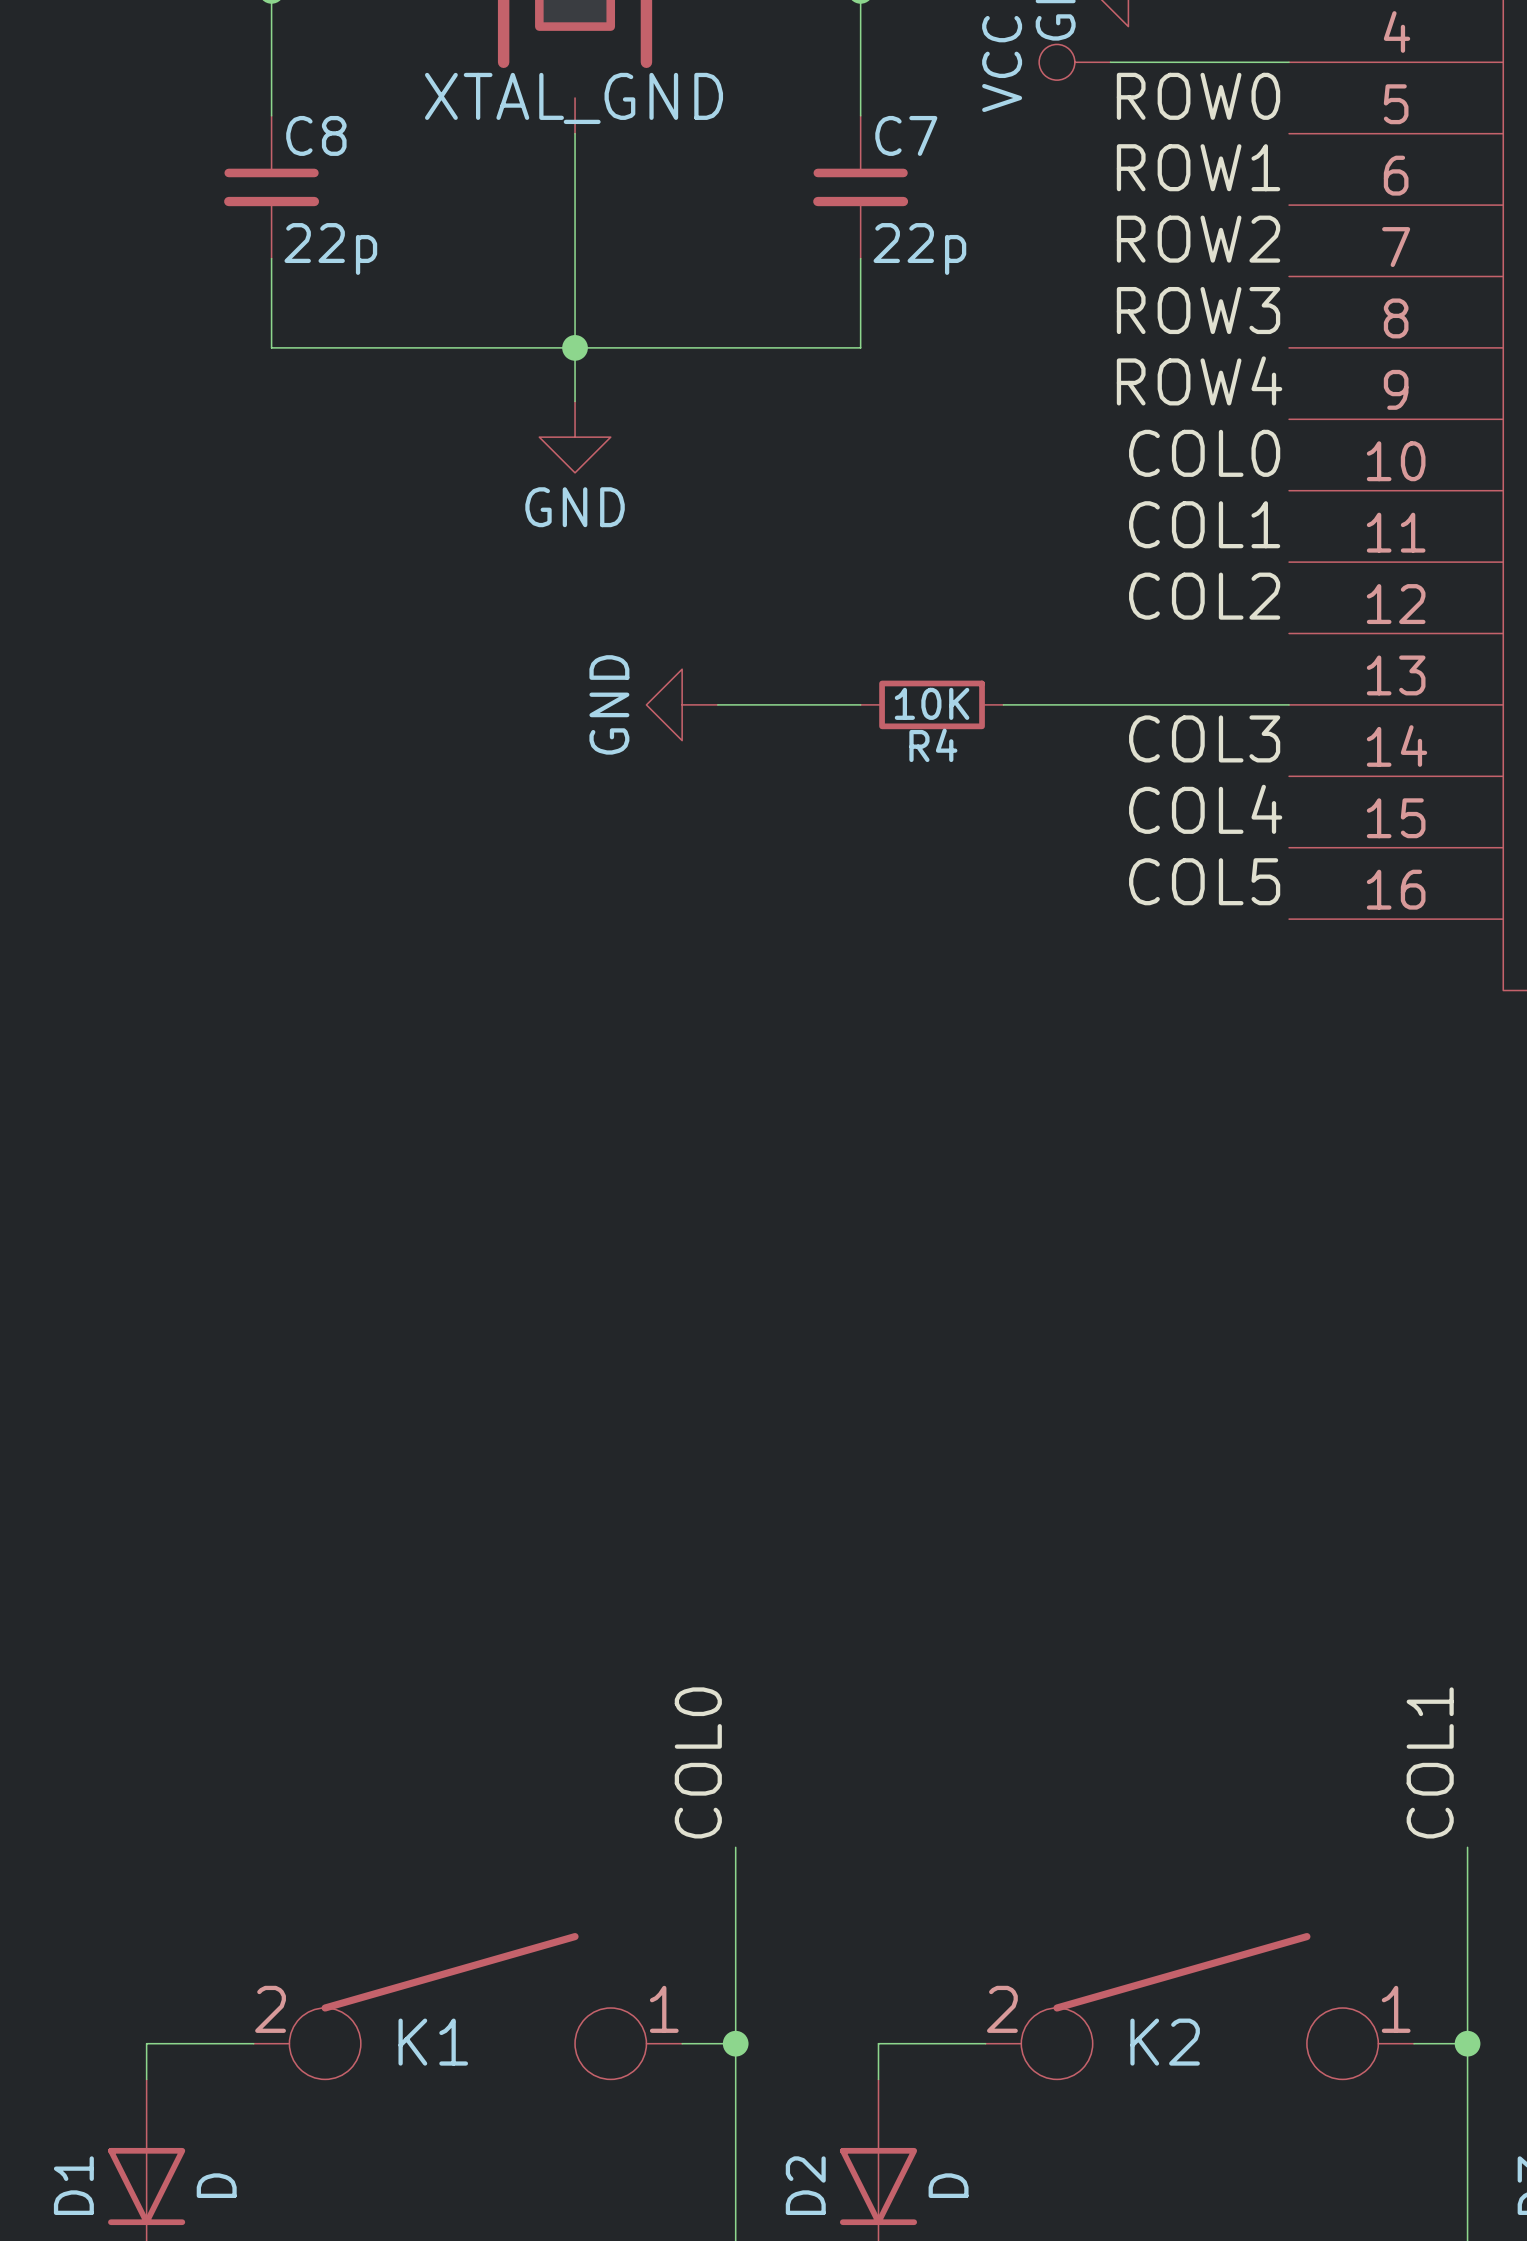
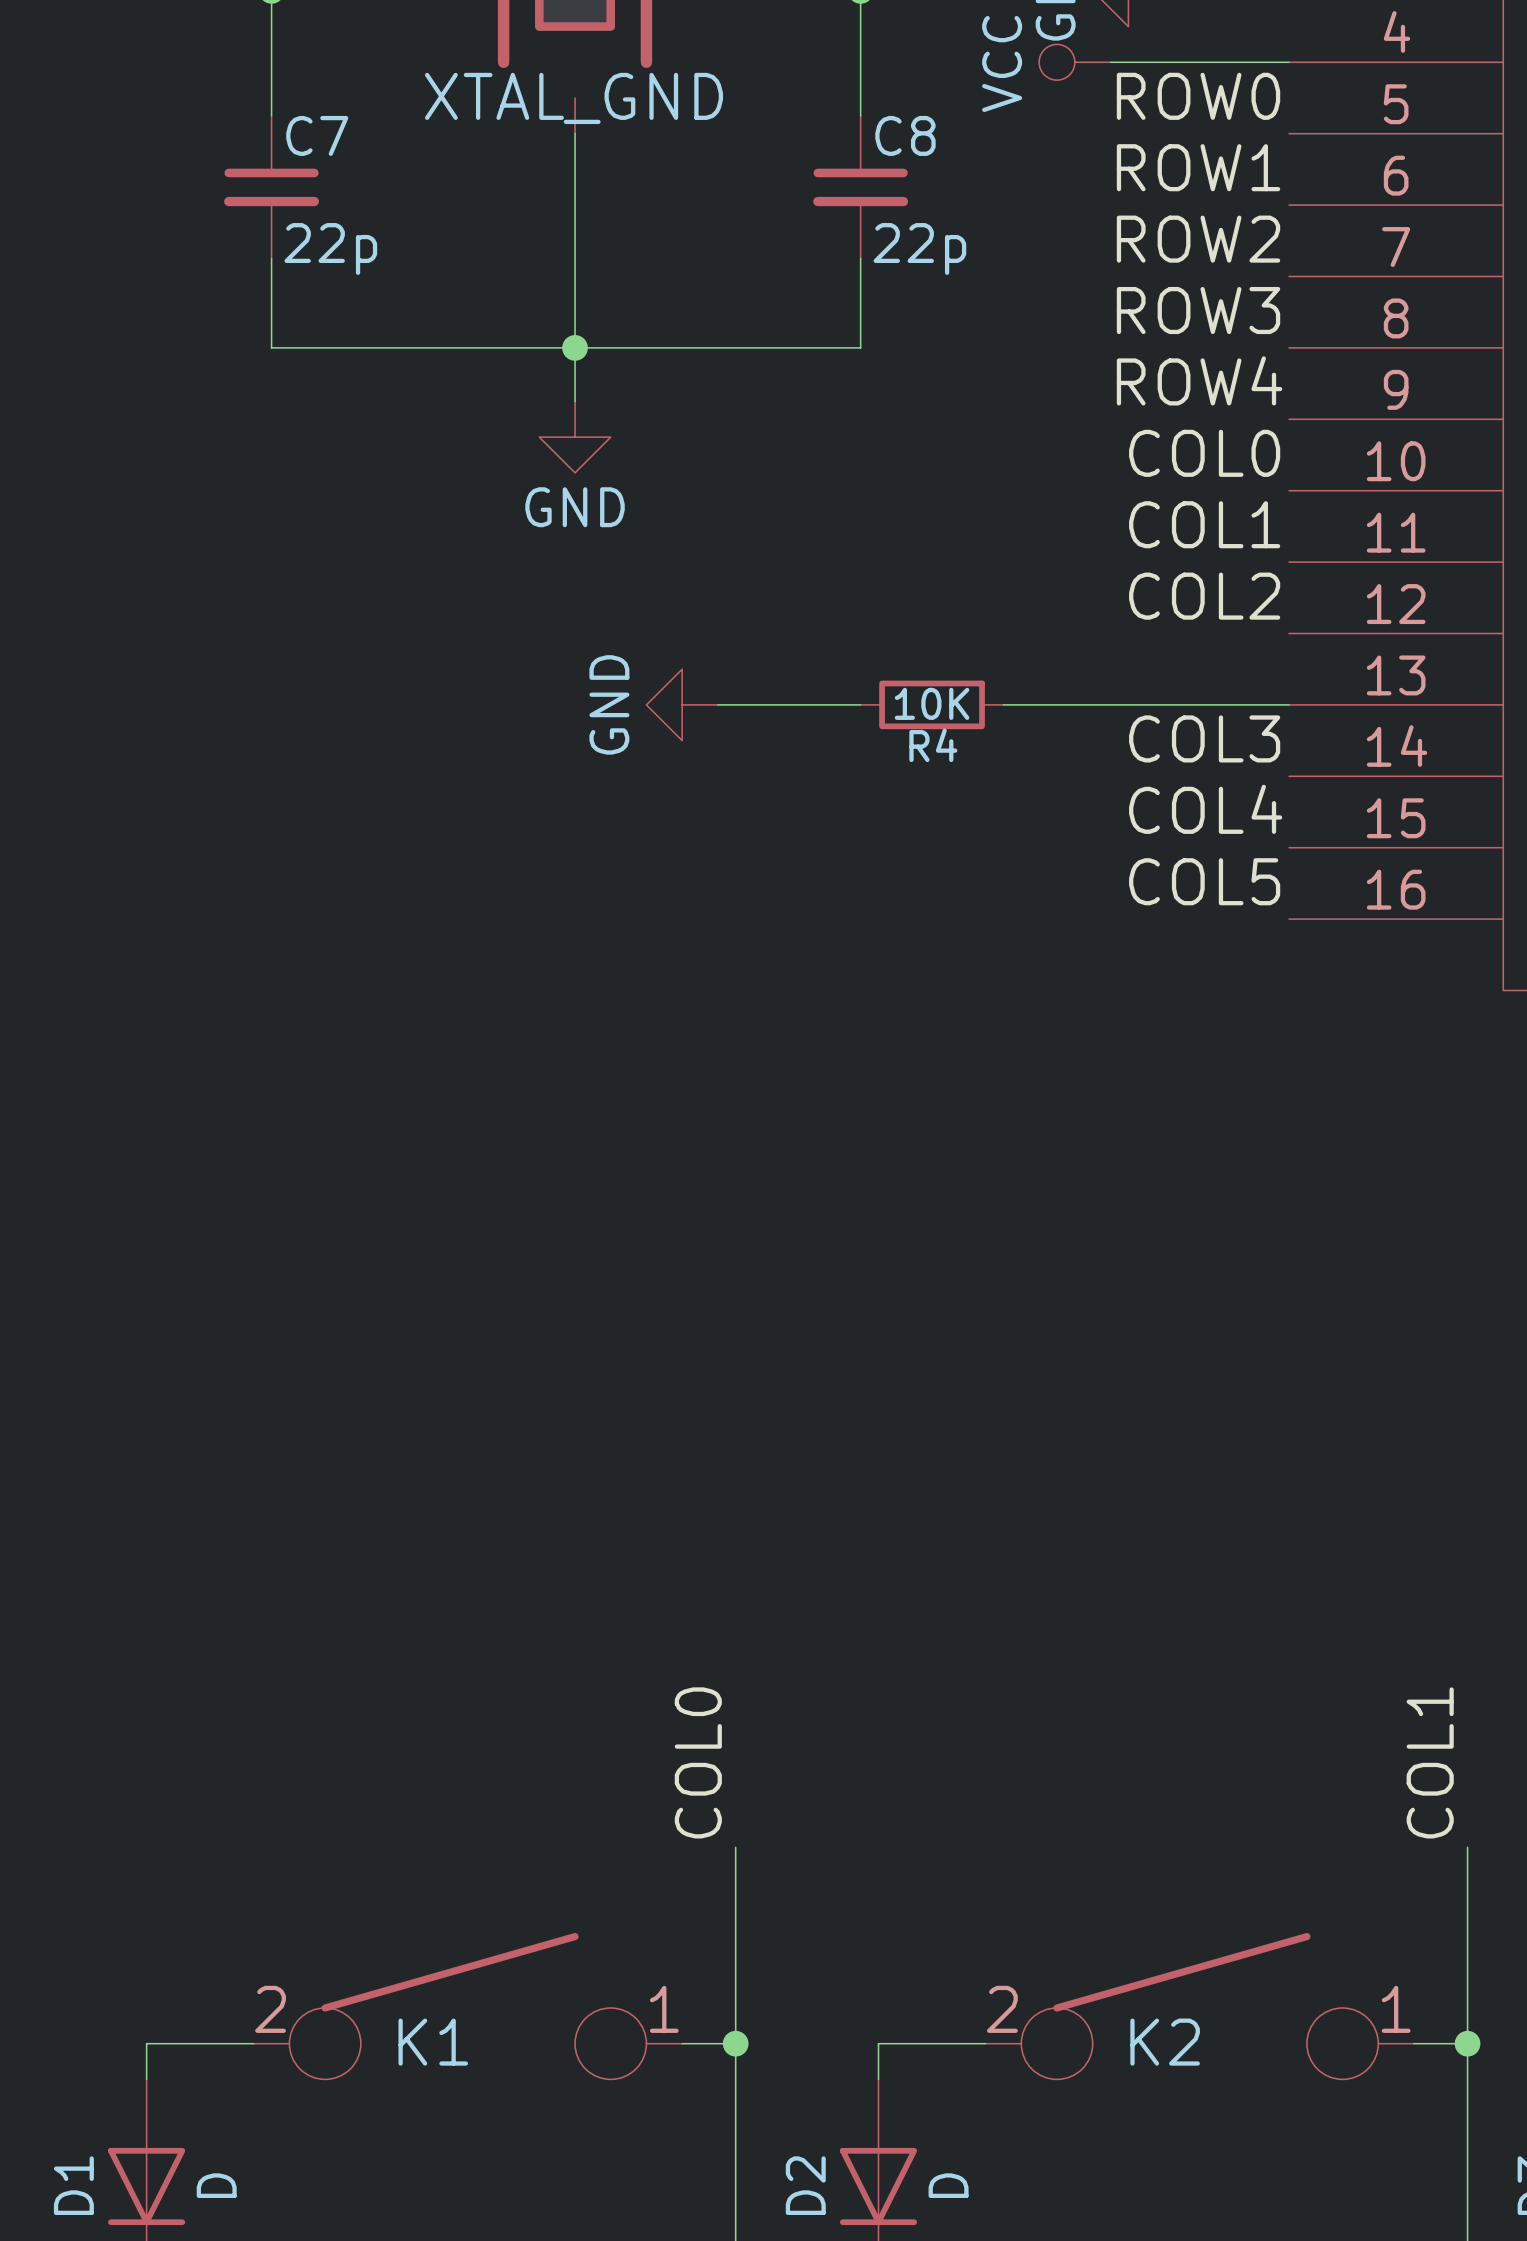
C8 name: C8 (316, 135) -> C7 (317, 135)
C7 name: C7 (906, 135) -> C8 (905, 135)

